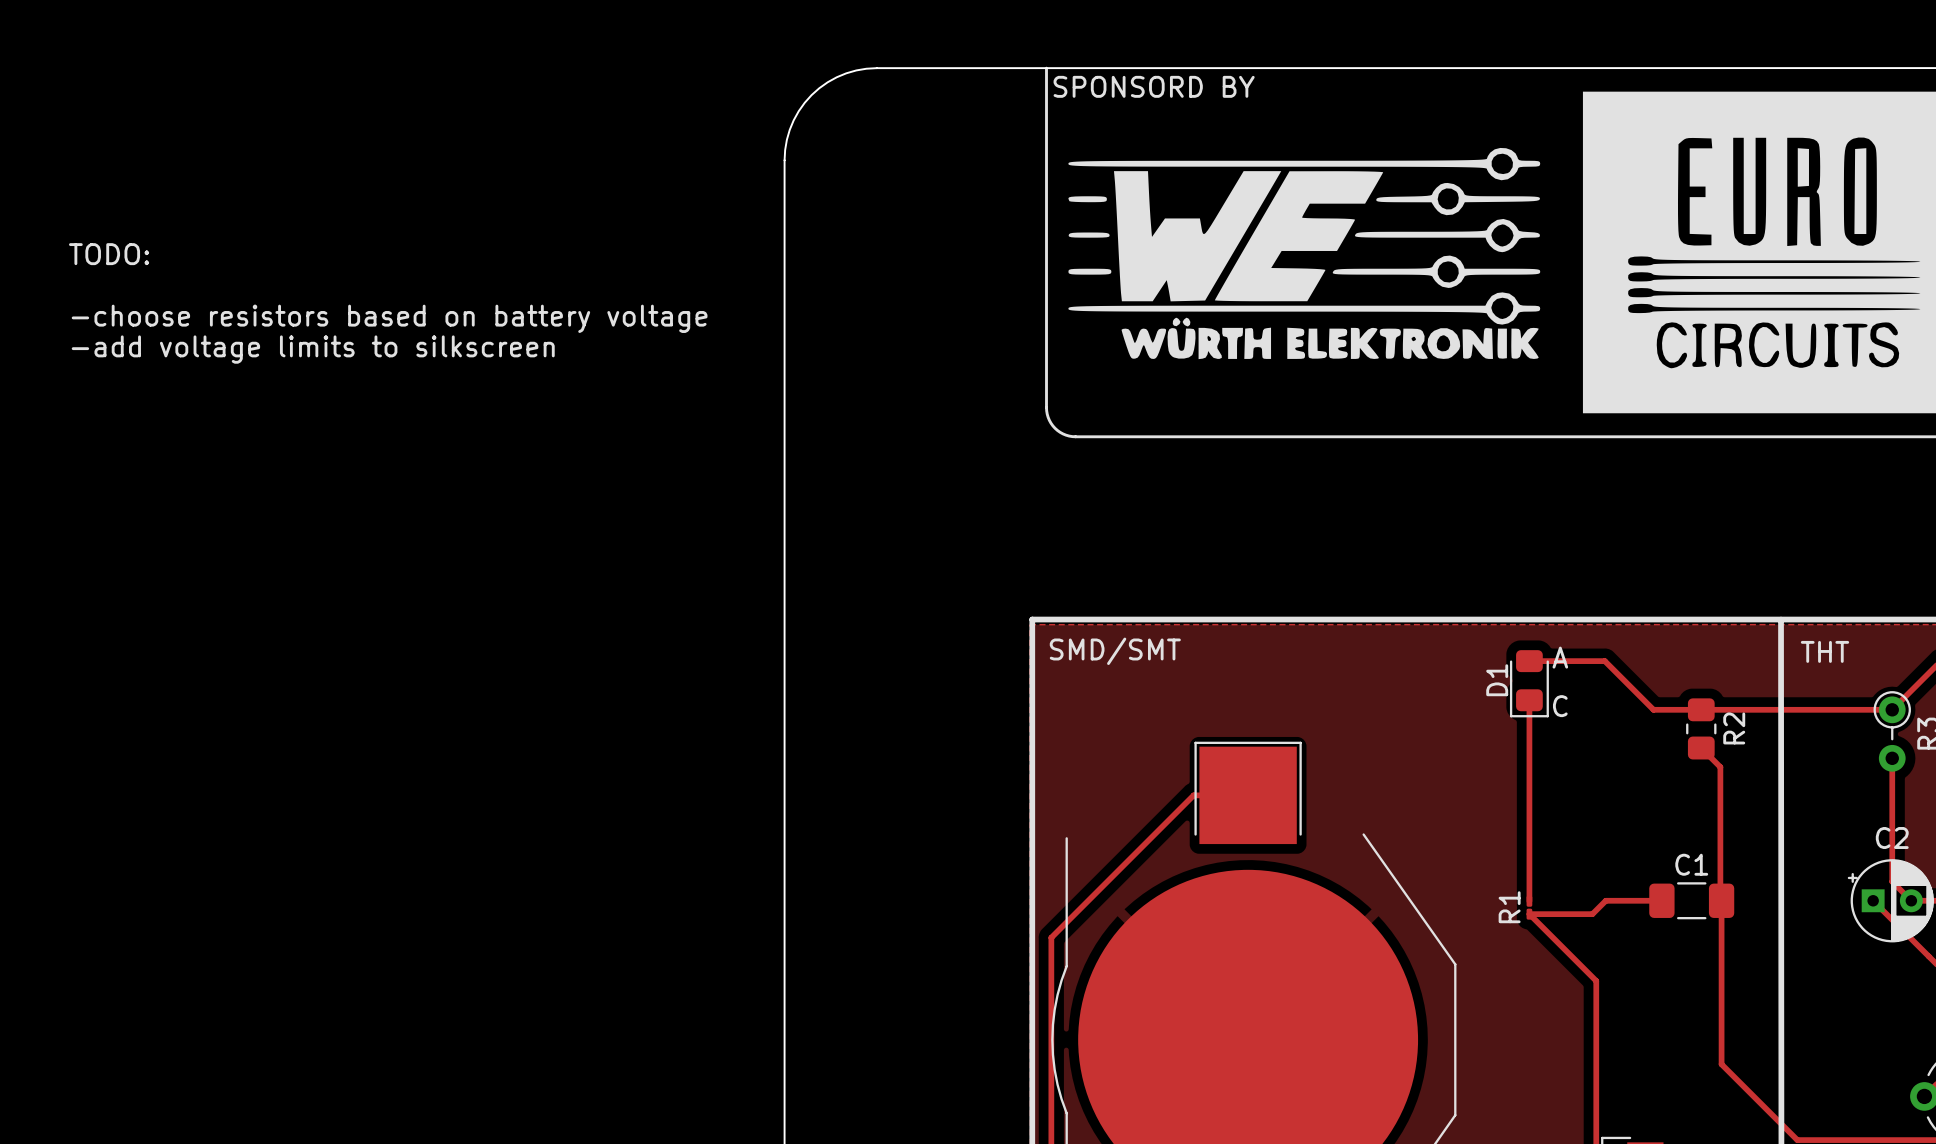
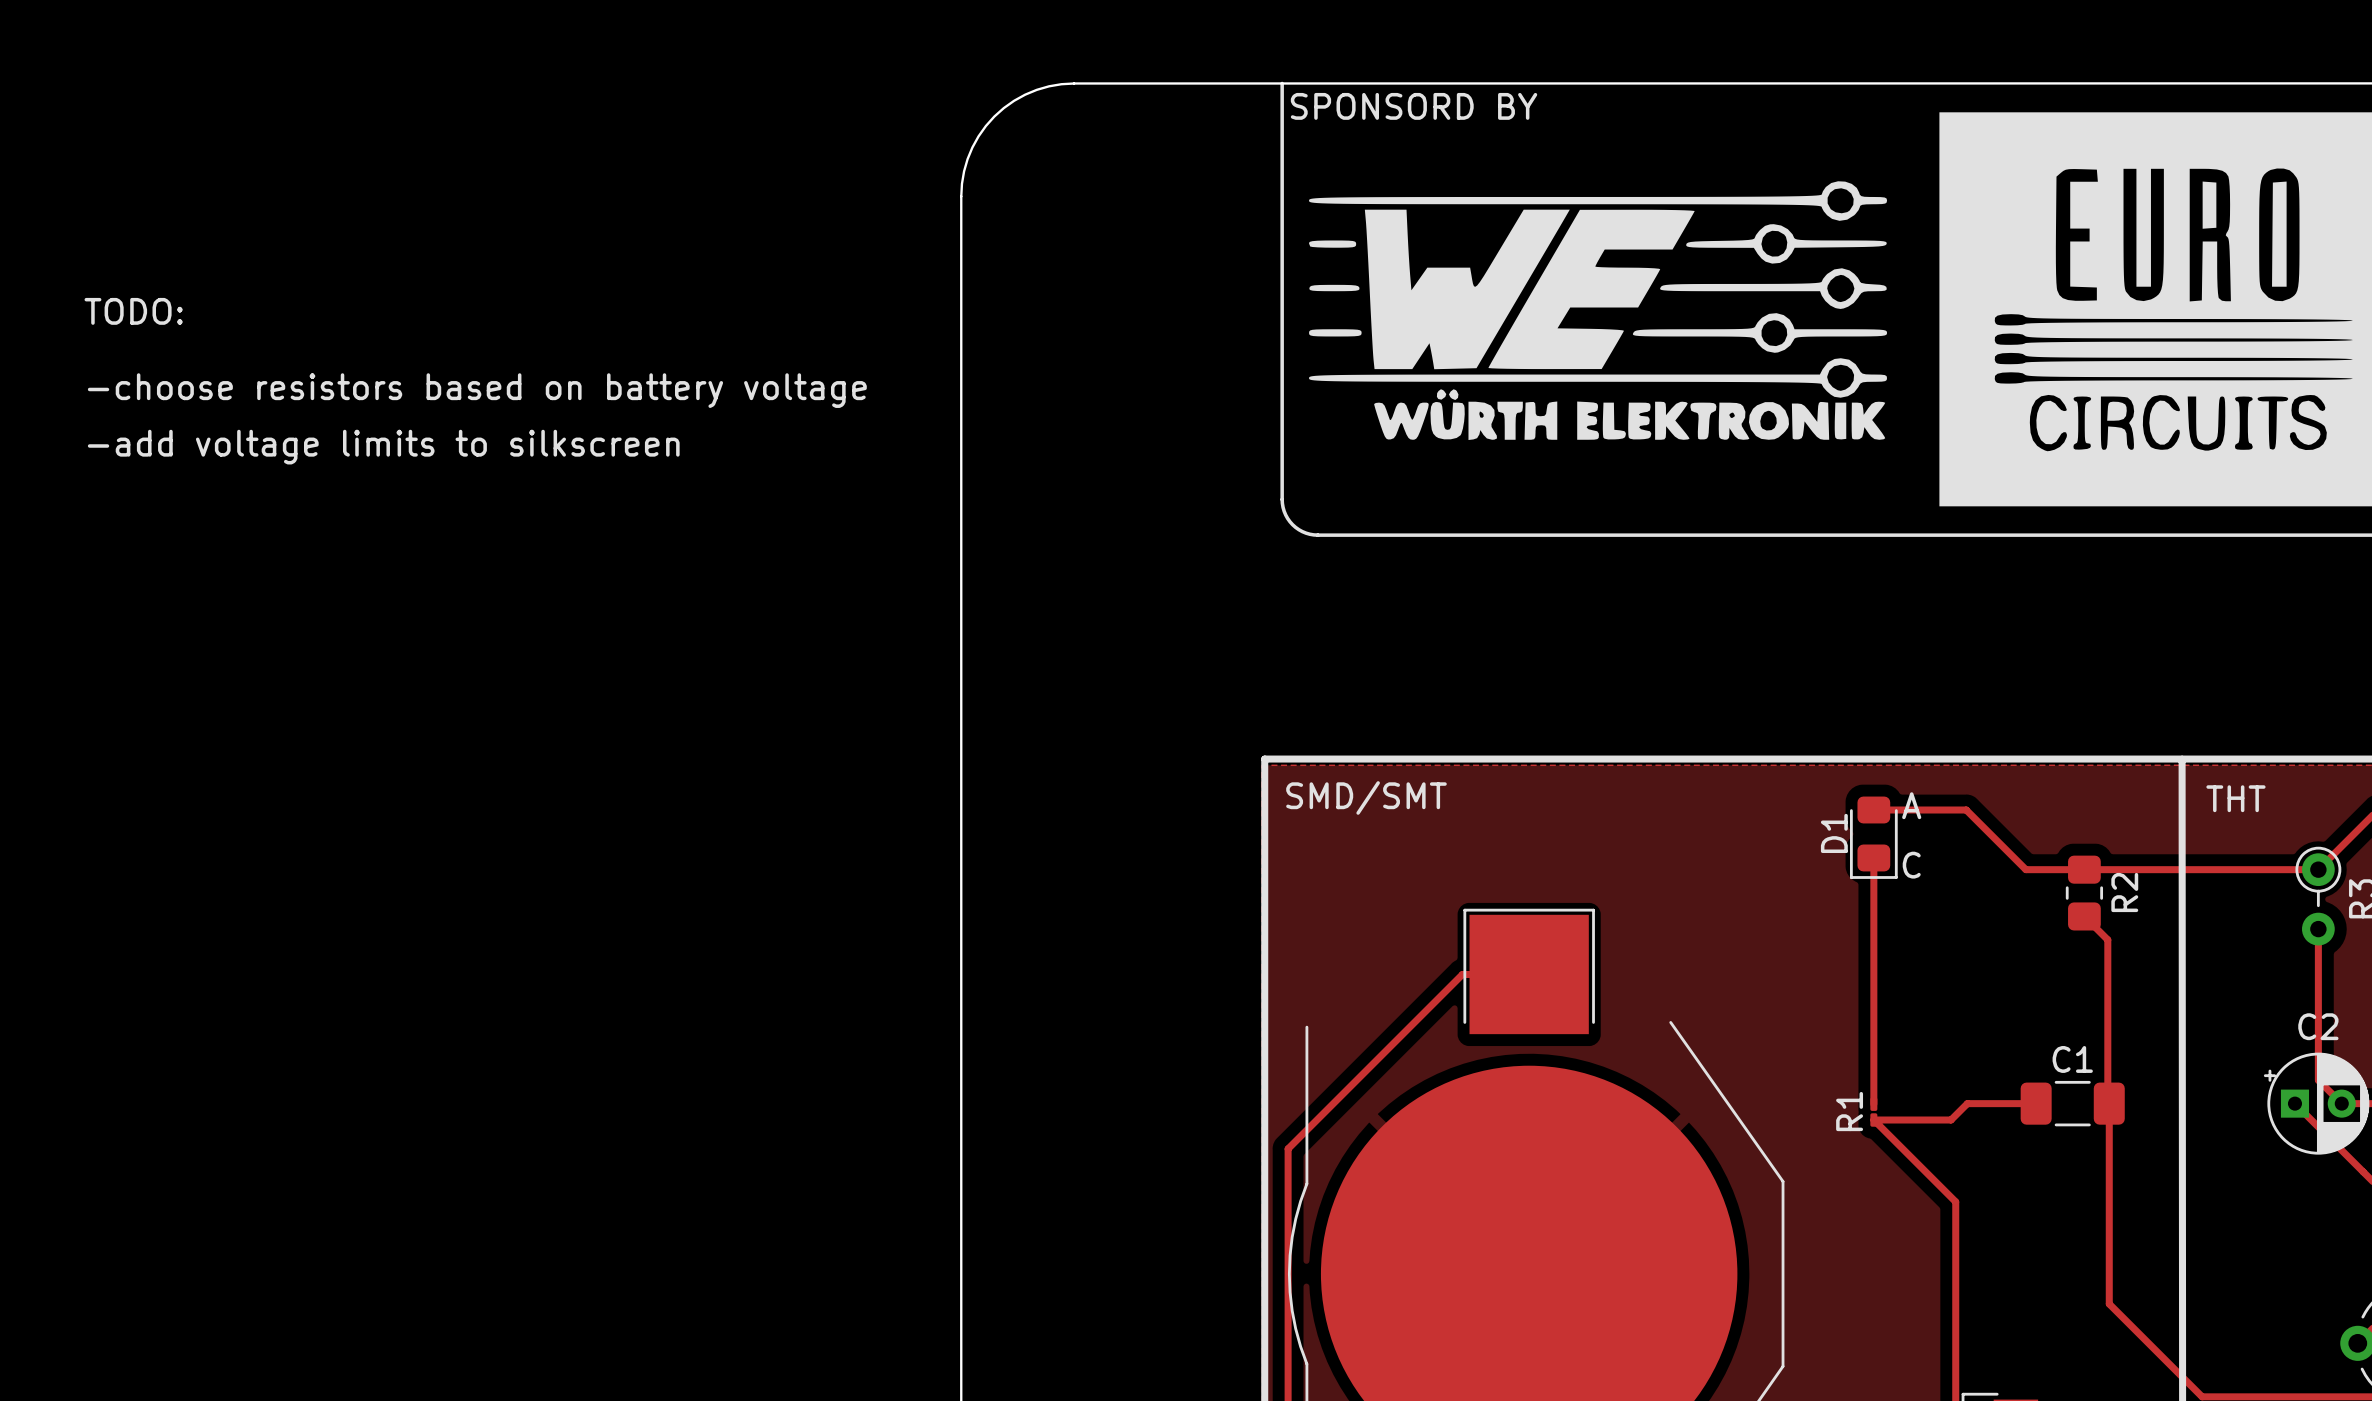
text position: -add voltage limits to silkscreen (313, 349) -> -add voltage limits to silkscreen (383, 447)

